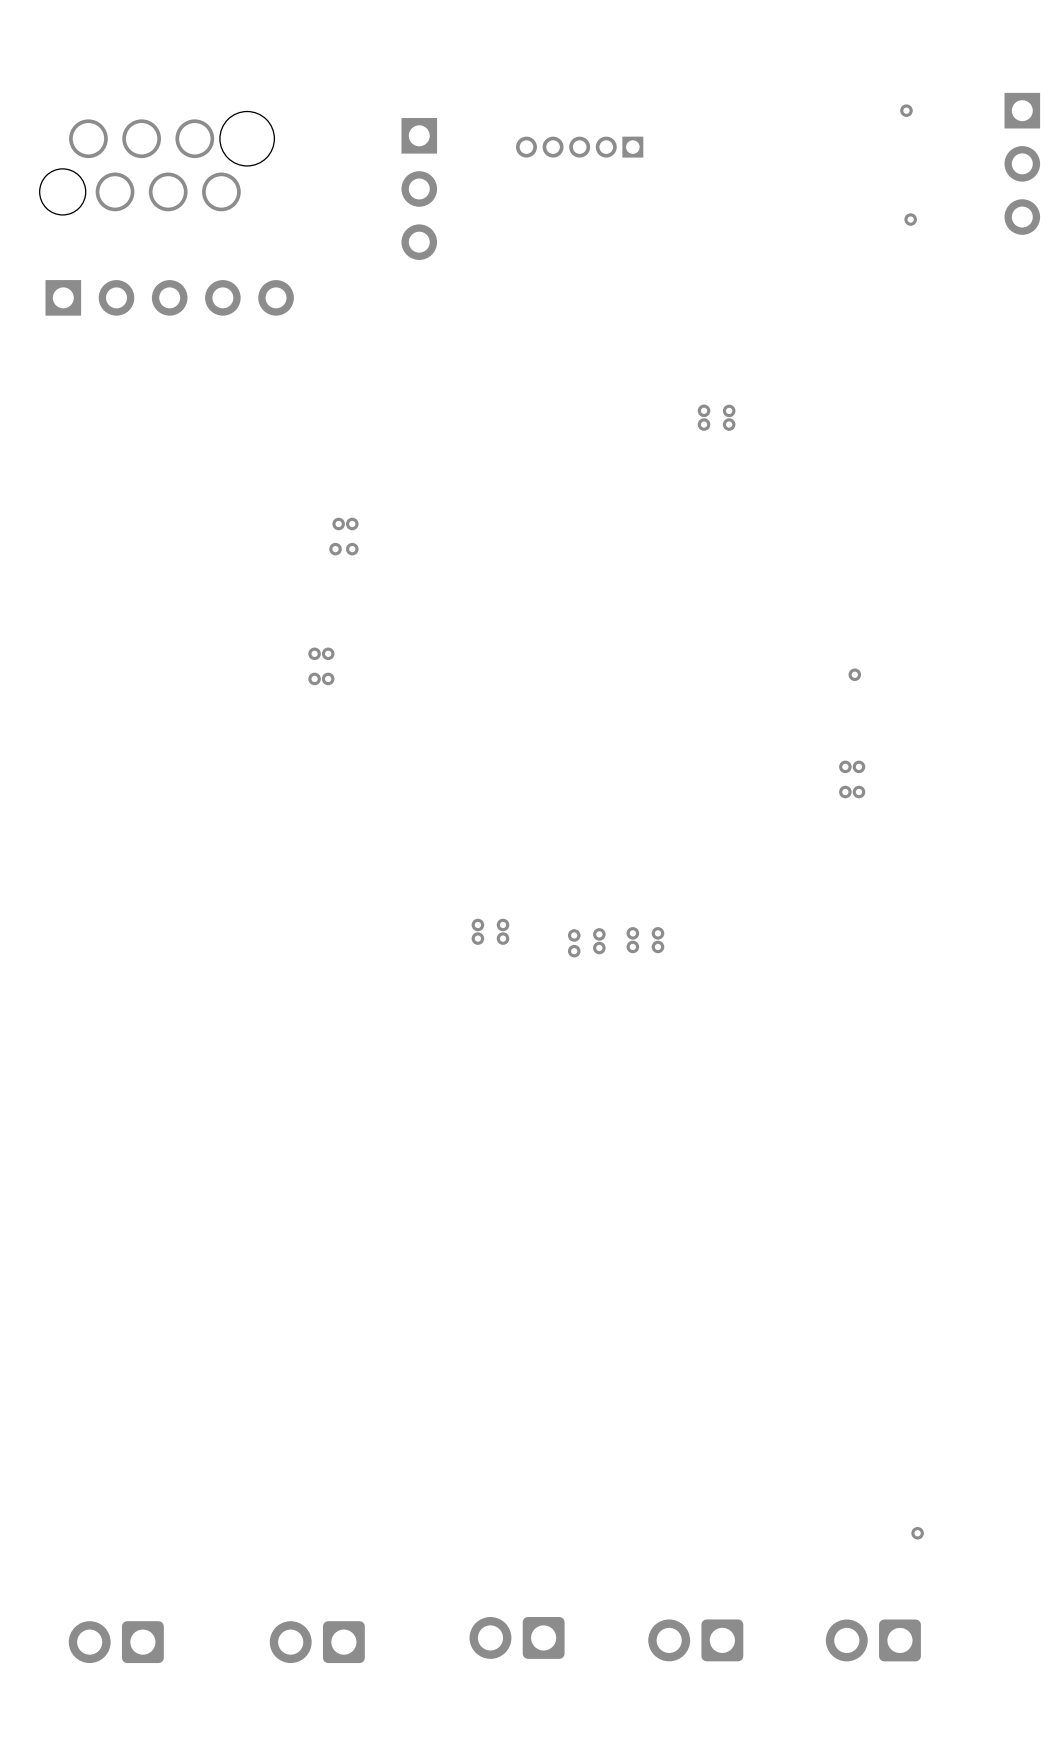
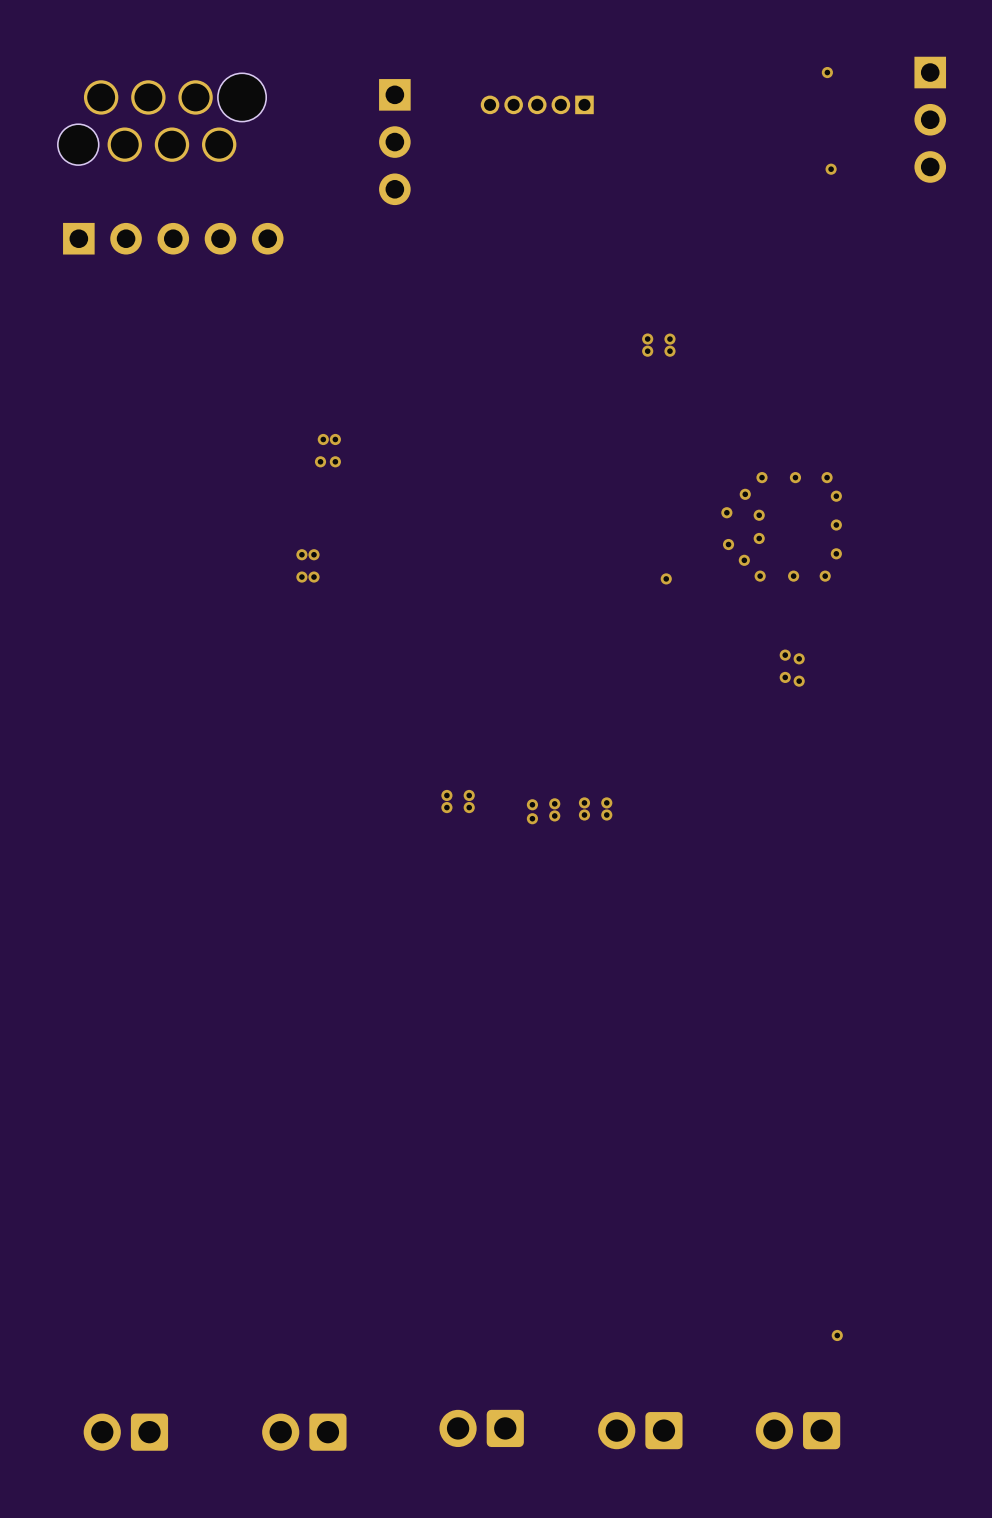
via: none -> (762, 477)
via: none -> (795, 477)
via: none -> (827, 477)
via: none -> (745, 494)
via: none -> (836, 496)
via: none -> (726, 512)
via: none -> (759, 515)
via: none -> (836, 525)
via: none -> (759, 538)
via: none -> (728, 544)
via: none -> (836, 553)
via: none -> (744, 560)
via: (854, 674) -> none
via: none -> (760, 576)
via: none -> (793, 576)
via: none -> (825, 576)
via: none -> (666, 578)
via: (845, 766) -> none
via: none -> (799, 658)
via: (845, 792) -> none
via: none -> (799, 681)

